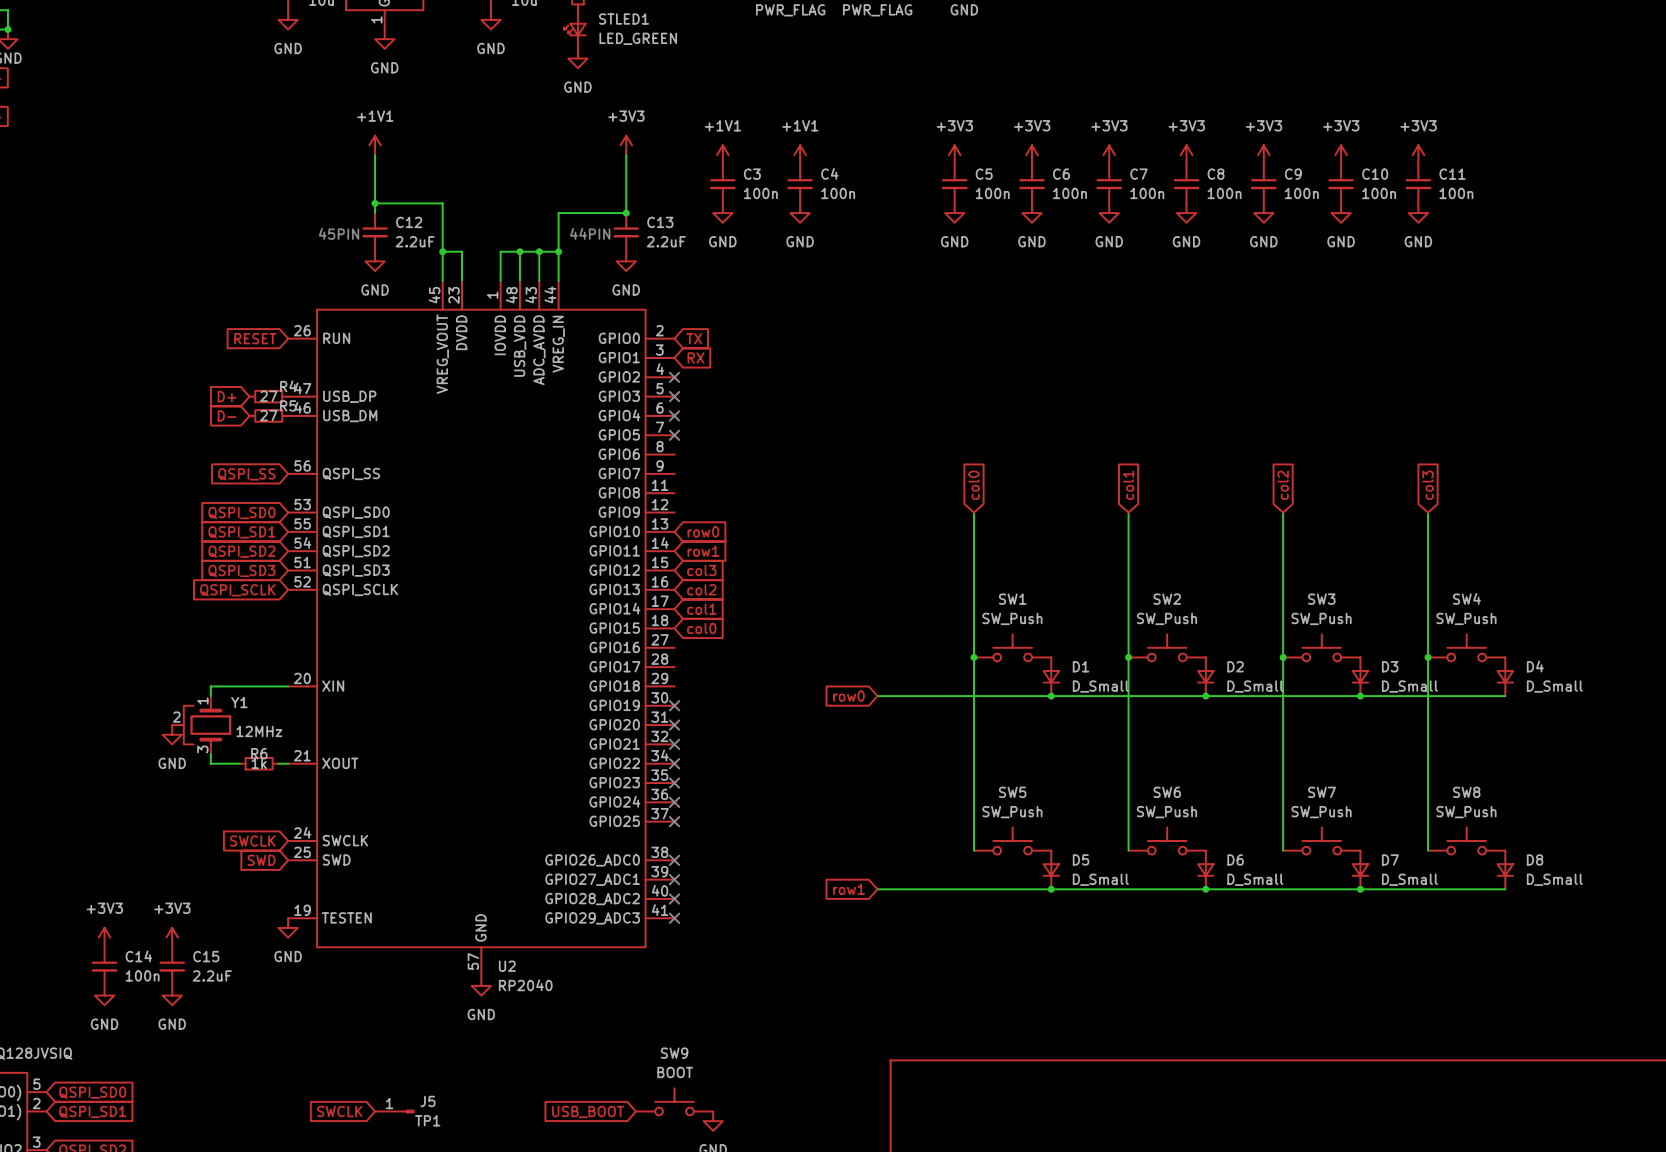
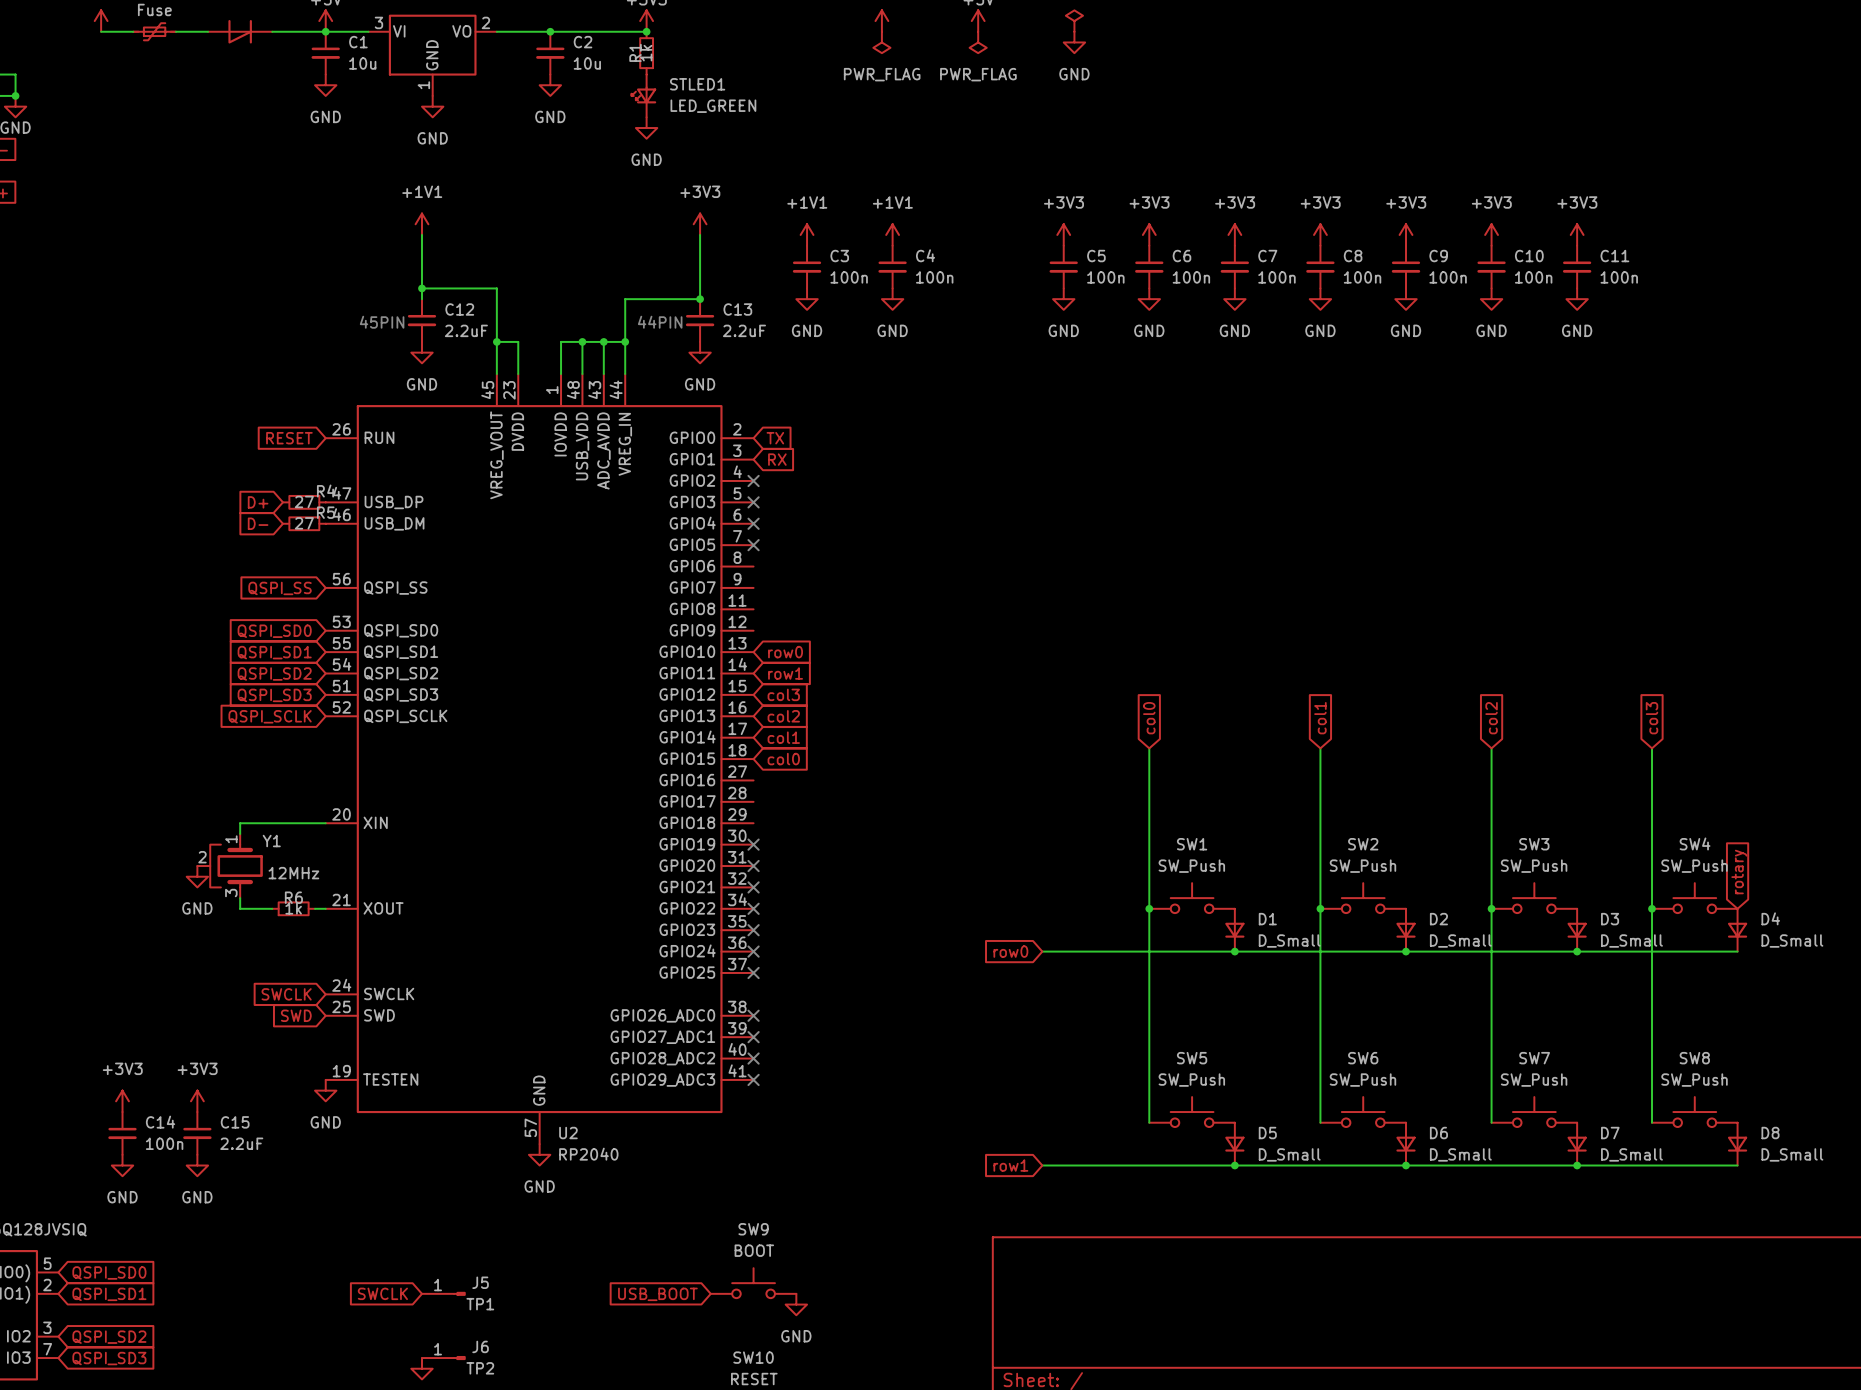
global label position: col0 (974, 485) -> col0 (1149, 718)
global label position: col1 (1128, 485) -> col1 (1320, 718)
global label position: col2 (1283, 485) -> col2 (1491, 718)
global label position: col3 (1428, 485) -> col3 (1652, 718)
wire: (974, 512) (974, 850) -> (1149, 748) (1149, 1122)
wire: (1128, 512) (1128, 850) -> (1320, 748) (1320, 1122)
wire: (1283, 512) (1283, 850) -> (1491, 748) (1491, 1122)
wire: (1428, 512) (1428, 850) -> (1652, 748) (1652, 1122)
SW1 position: (1012, 647) -> (1192, 898)
SW2 position: (1167, 647) -> (1363, 898)
SW3 position: (1321, 647) -> (1534, 898)
SW4 position: (1466, 647) -> (1694, 898)
junction: (974, 657) -> none
junction: (1128, 657) -> none
junction: (1283, 657) -> none
junction: (1428, 657) -> none
D1 position: (1051, 676) -> (1234, 930)
D2 position: (1205, 676) -> (1406, 930)
D3 position: (1360, 676) -> (1577, 930)
D4 position: (1505, 676) -> (1737, 930)
global label position: row0 (848, 696) -> row0 (1010, 951)
wire: (877, 696) (1505, 696) -> (1042, 951) (1737, 951)
junction: (1051, 696) -> none
junction: (1205, 696) -> none
junction: (1360, 696) -> none
global label: none -> rotary (1739, 871)
junction: none -> (1149, 908)
junction: none -> (1320, 908)
junction: none -> (1491, 908)
junction: none -> (1652, 908)
junction: none -> (1234, 951)
junction: none -> (1406, 951)
junction: none -> (1577, 951)
SW5 position: (1012, 841) -> (1192, 1112)
SW6 position: (1167, 841) -> (1363, 1112)
SW7 position: (1321, 841) -> (1534, 1112)
SW8 position: (1466, 841) -> (1694, 1112)
D5 position: (1051, 869) -> (1234, 1144)
D6 position: (1205, 869) -> (1406, 1144)
D7 position: (1360, 869) -> (1577, 1144)
D8 position: (1505, 869) -> (1737, 1144)
global label position: row1 (848, 889) -> row1 (1010, 1165)
wire: (877, 889) (1505, 889) -> (1042, 1165) (1737, 1165)
junction: (1051, 889) -> none
junction: (1205, 889) -> none
junction: (1360, 889) -> none
junction: none -> (1234, 1165)
junction: none -> (1406, 1165)
junction: none -> (1577, 1165)

